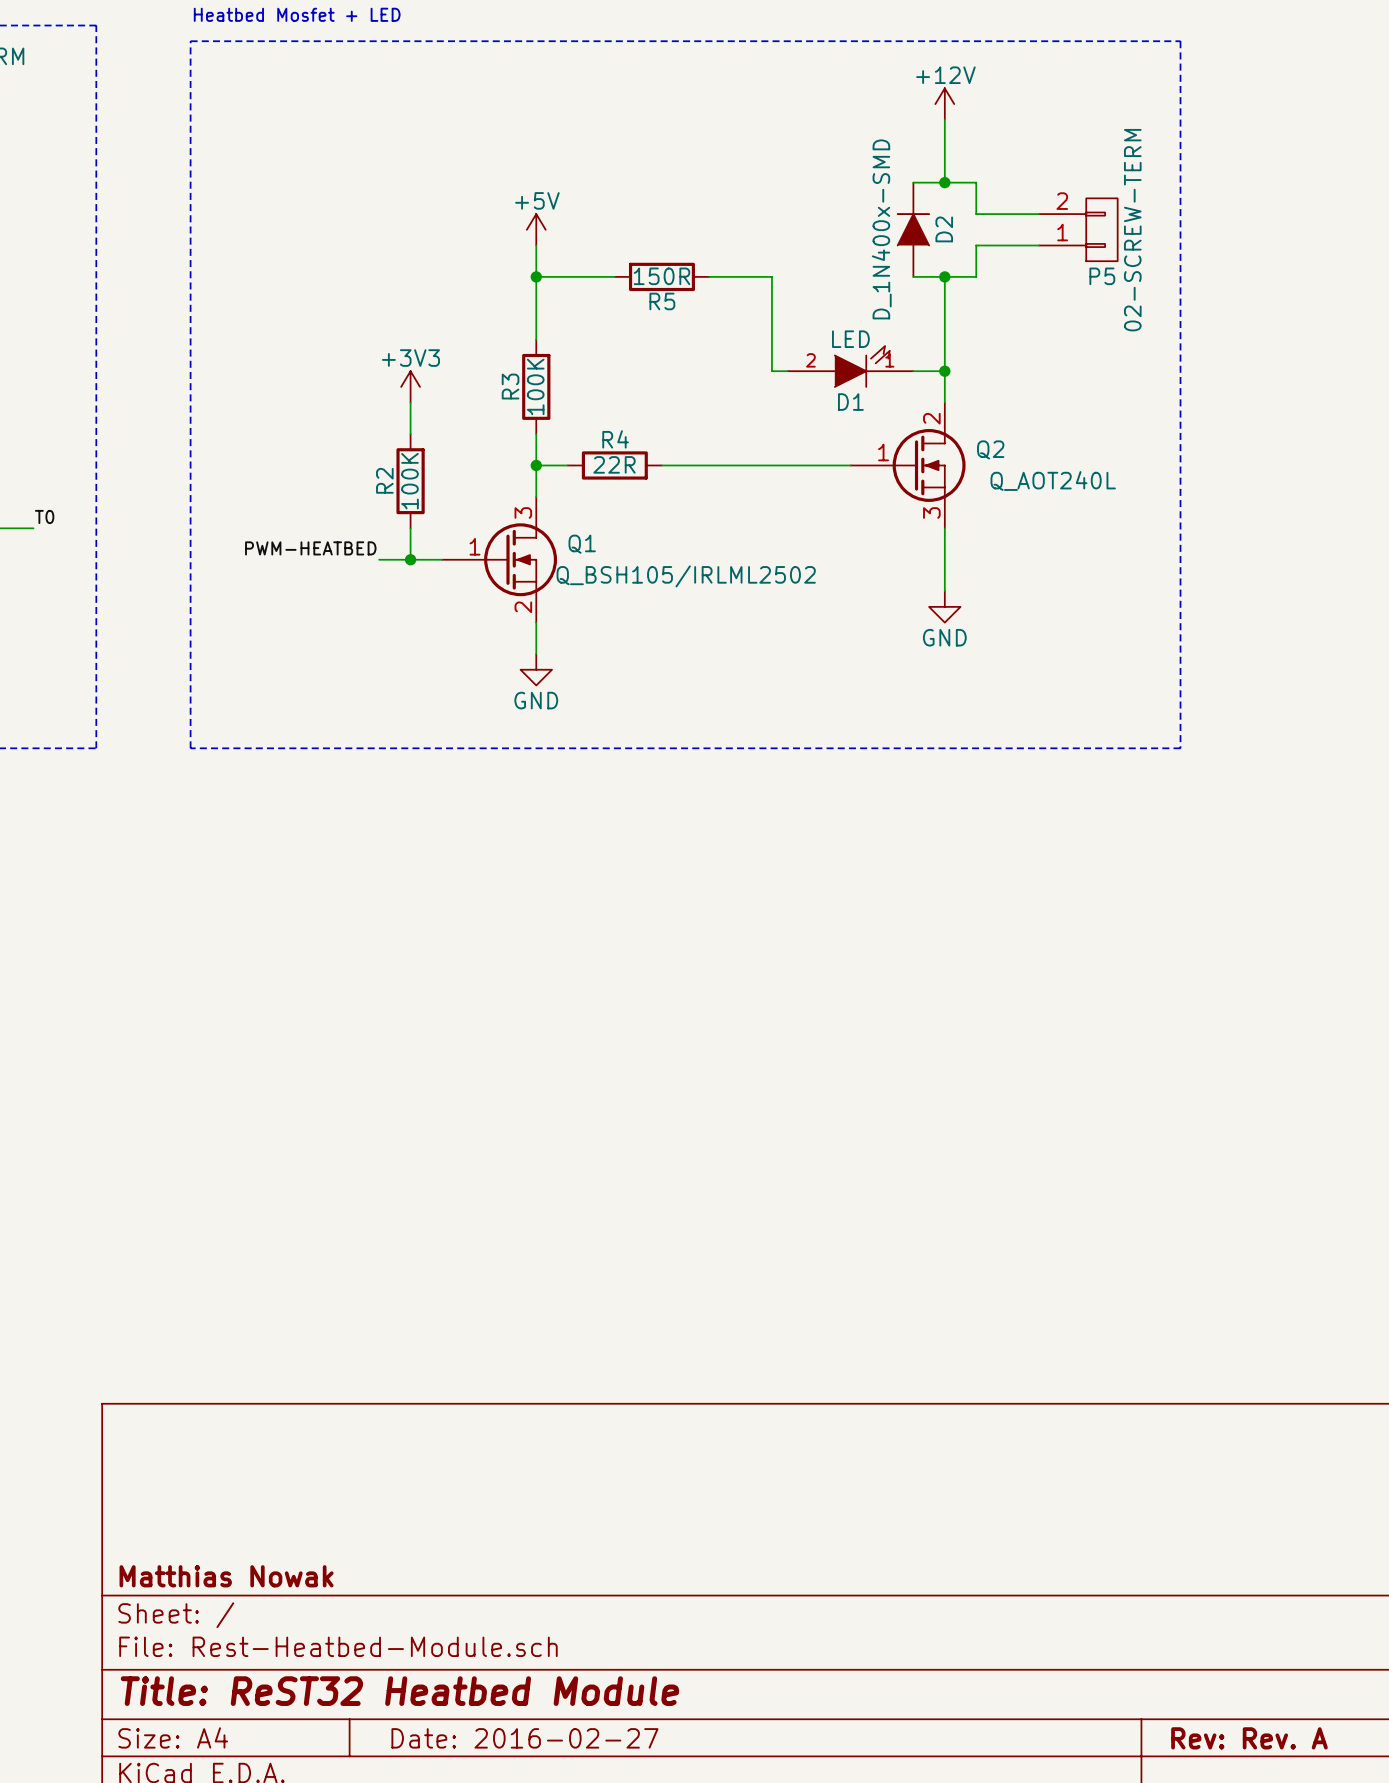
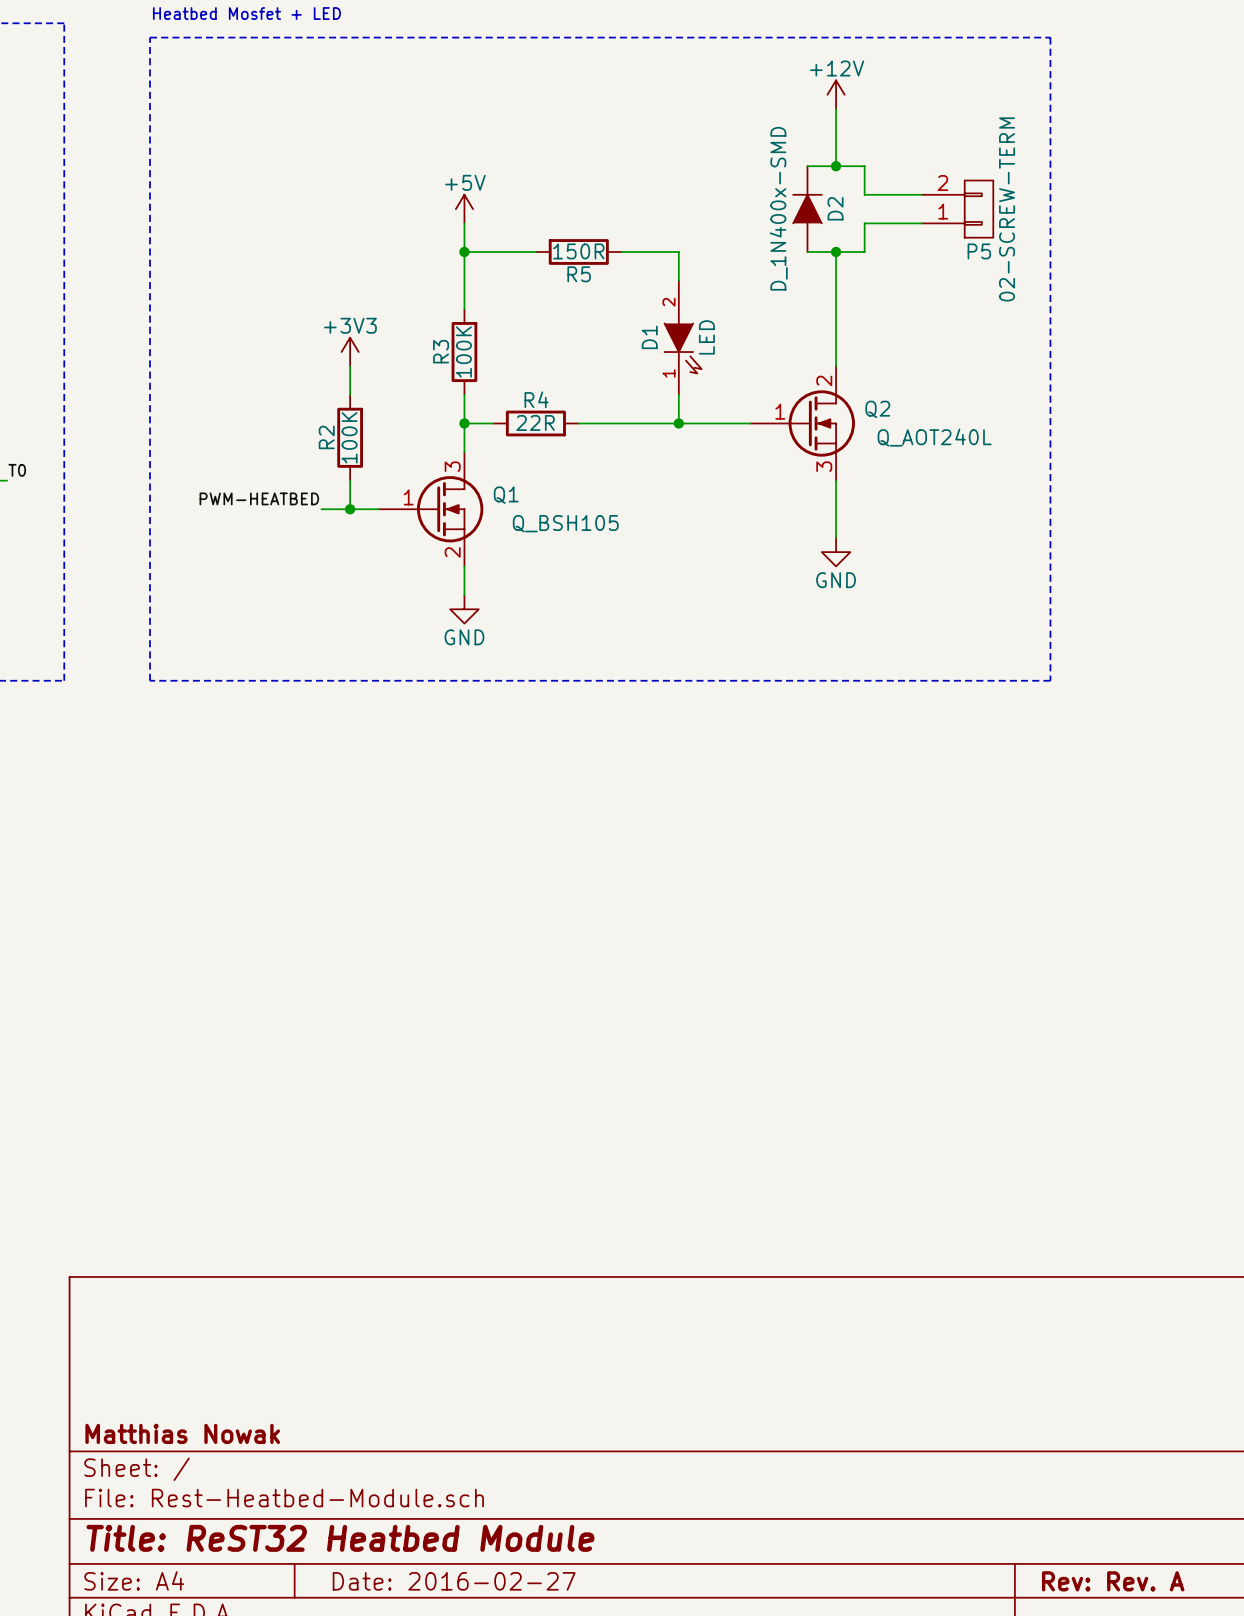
D1 rotation: 0° (862, 366) -> 90° clockwise (683, 348)
wire: (913, 371) (944, 371) -> none
junction: (944, 371) -> none
wire: none -> (678, 394) (678, 423)
junction: none -> (678, 423)
Q1 value: Q_BSH105/IRLML2502 (686, 576) -> Q_BSH105 (565, 523)

